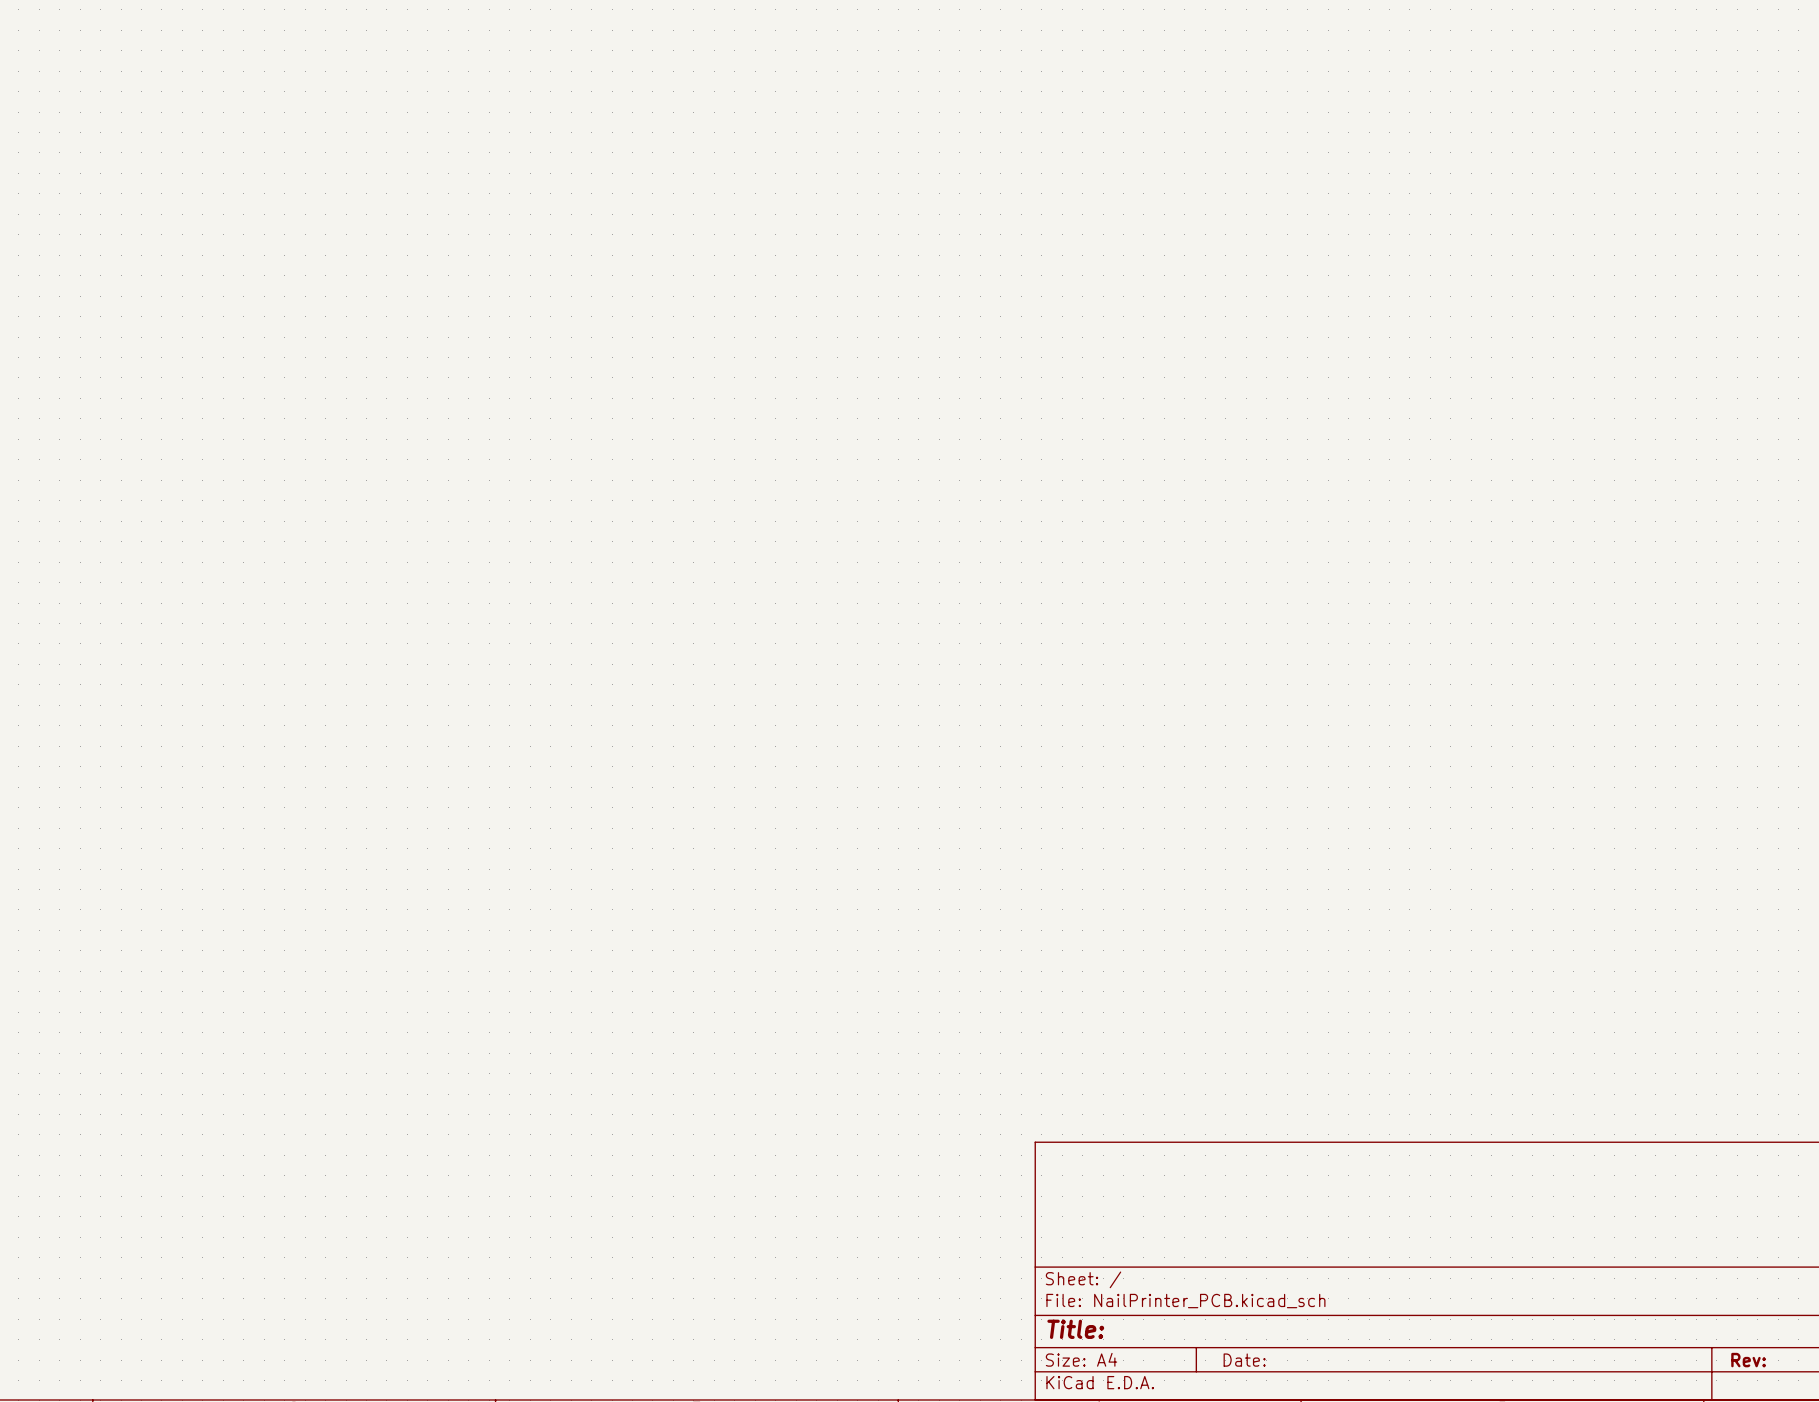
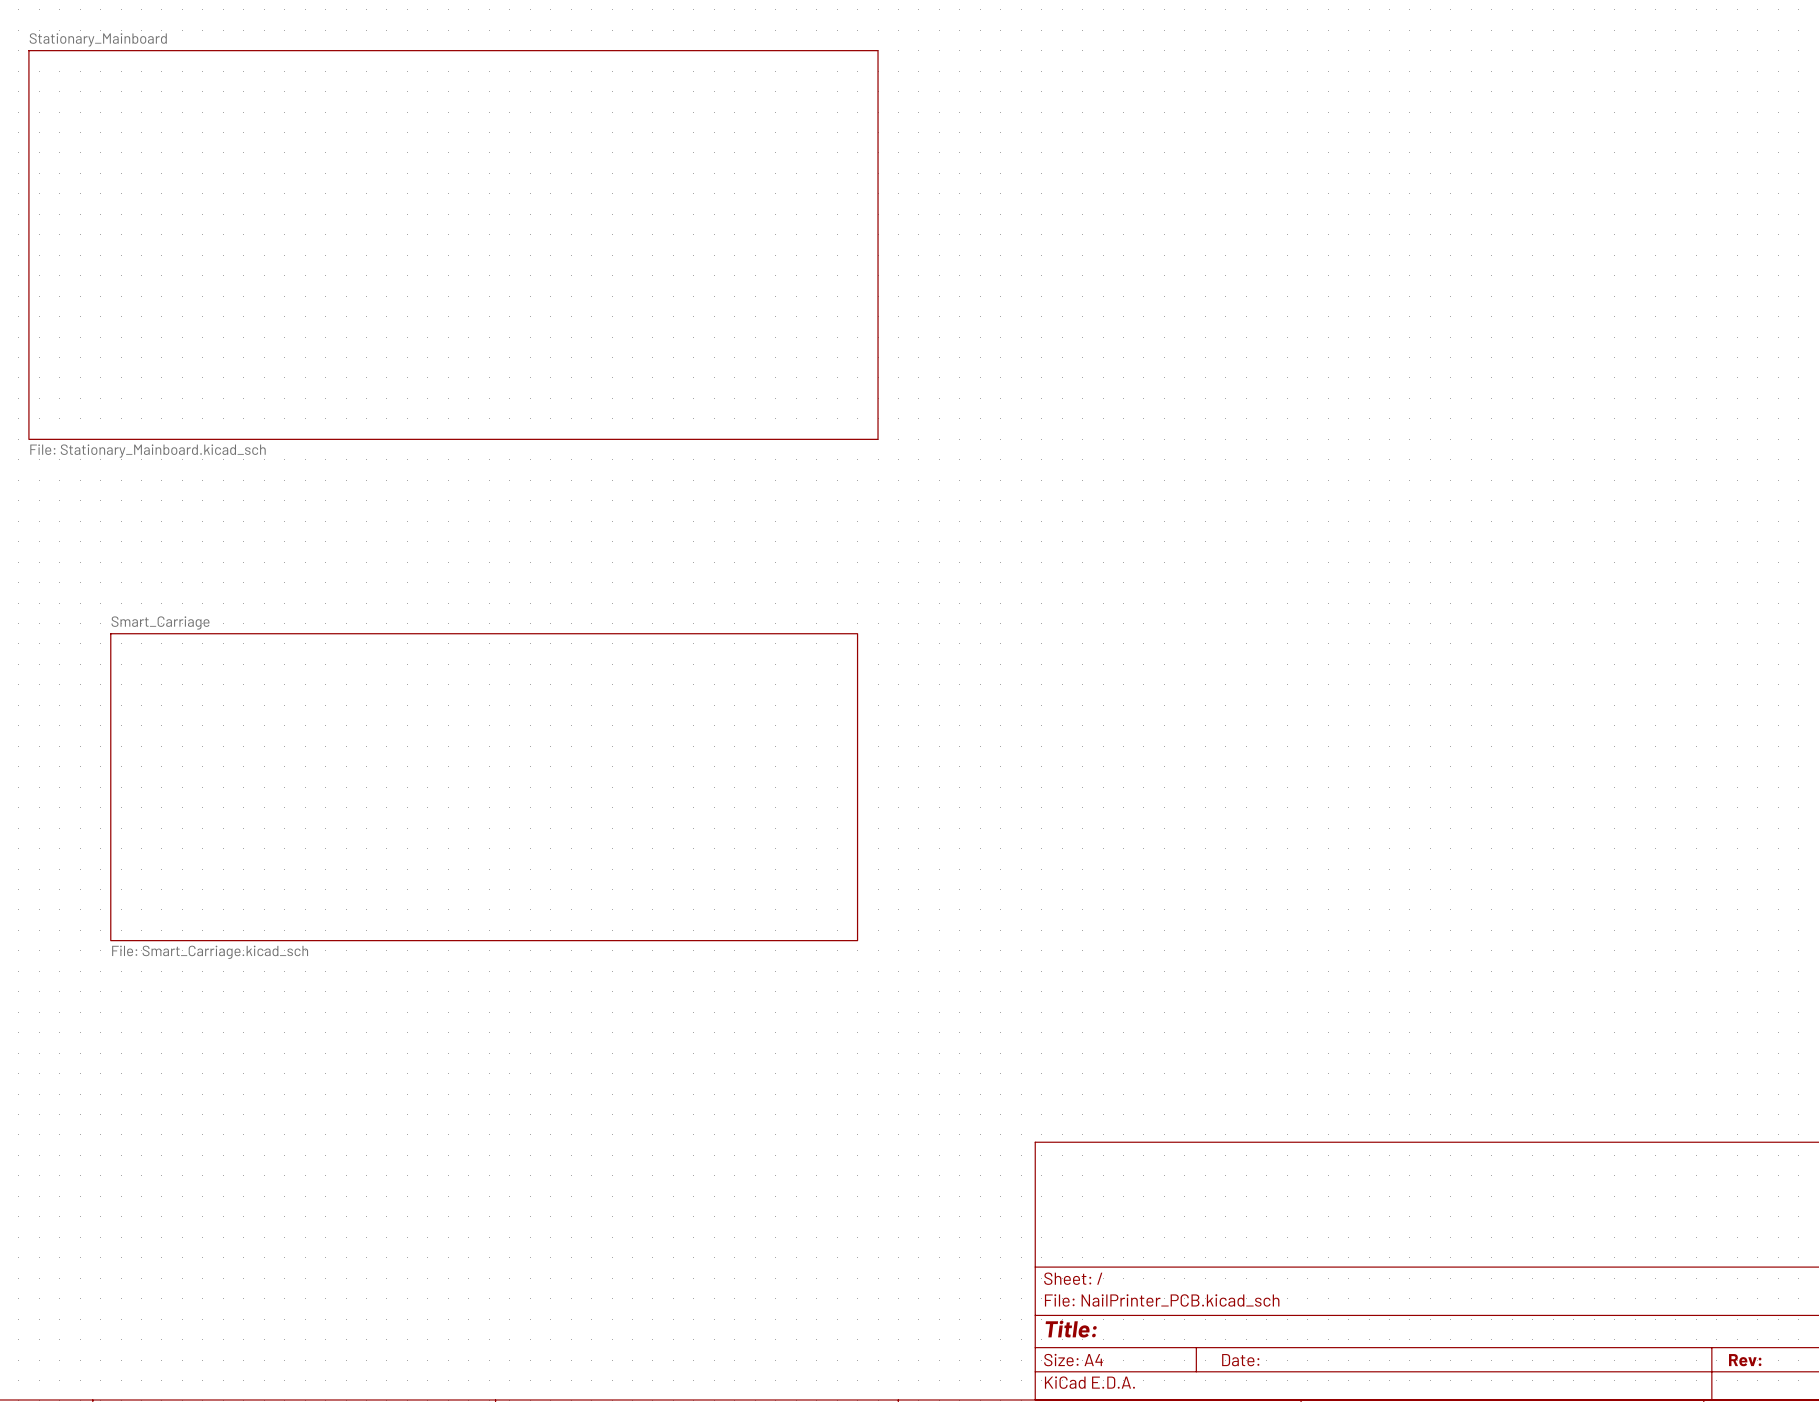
sheet Stationary_Mainboard: none -> File: Stationary_Mainboard.kicad_sch (453, 244)
sheet Smart_Carriage: none -> File: Smart_Carriage.kicad_sch (484, 787)

